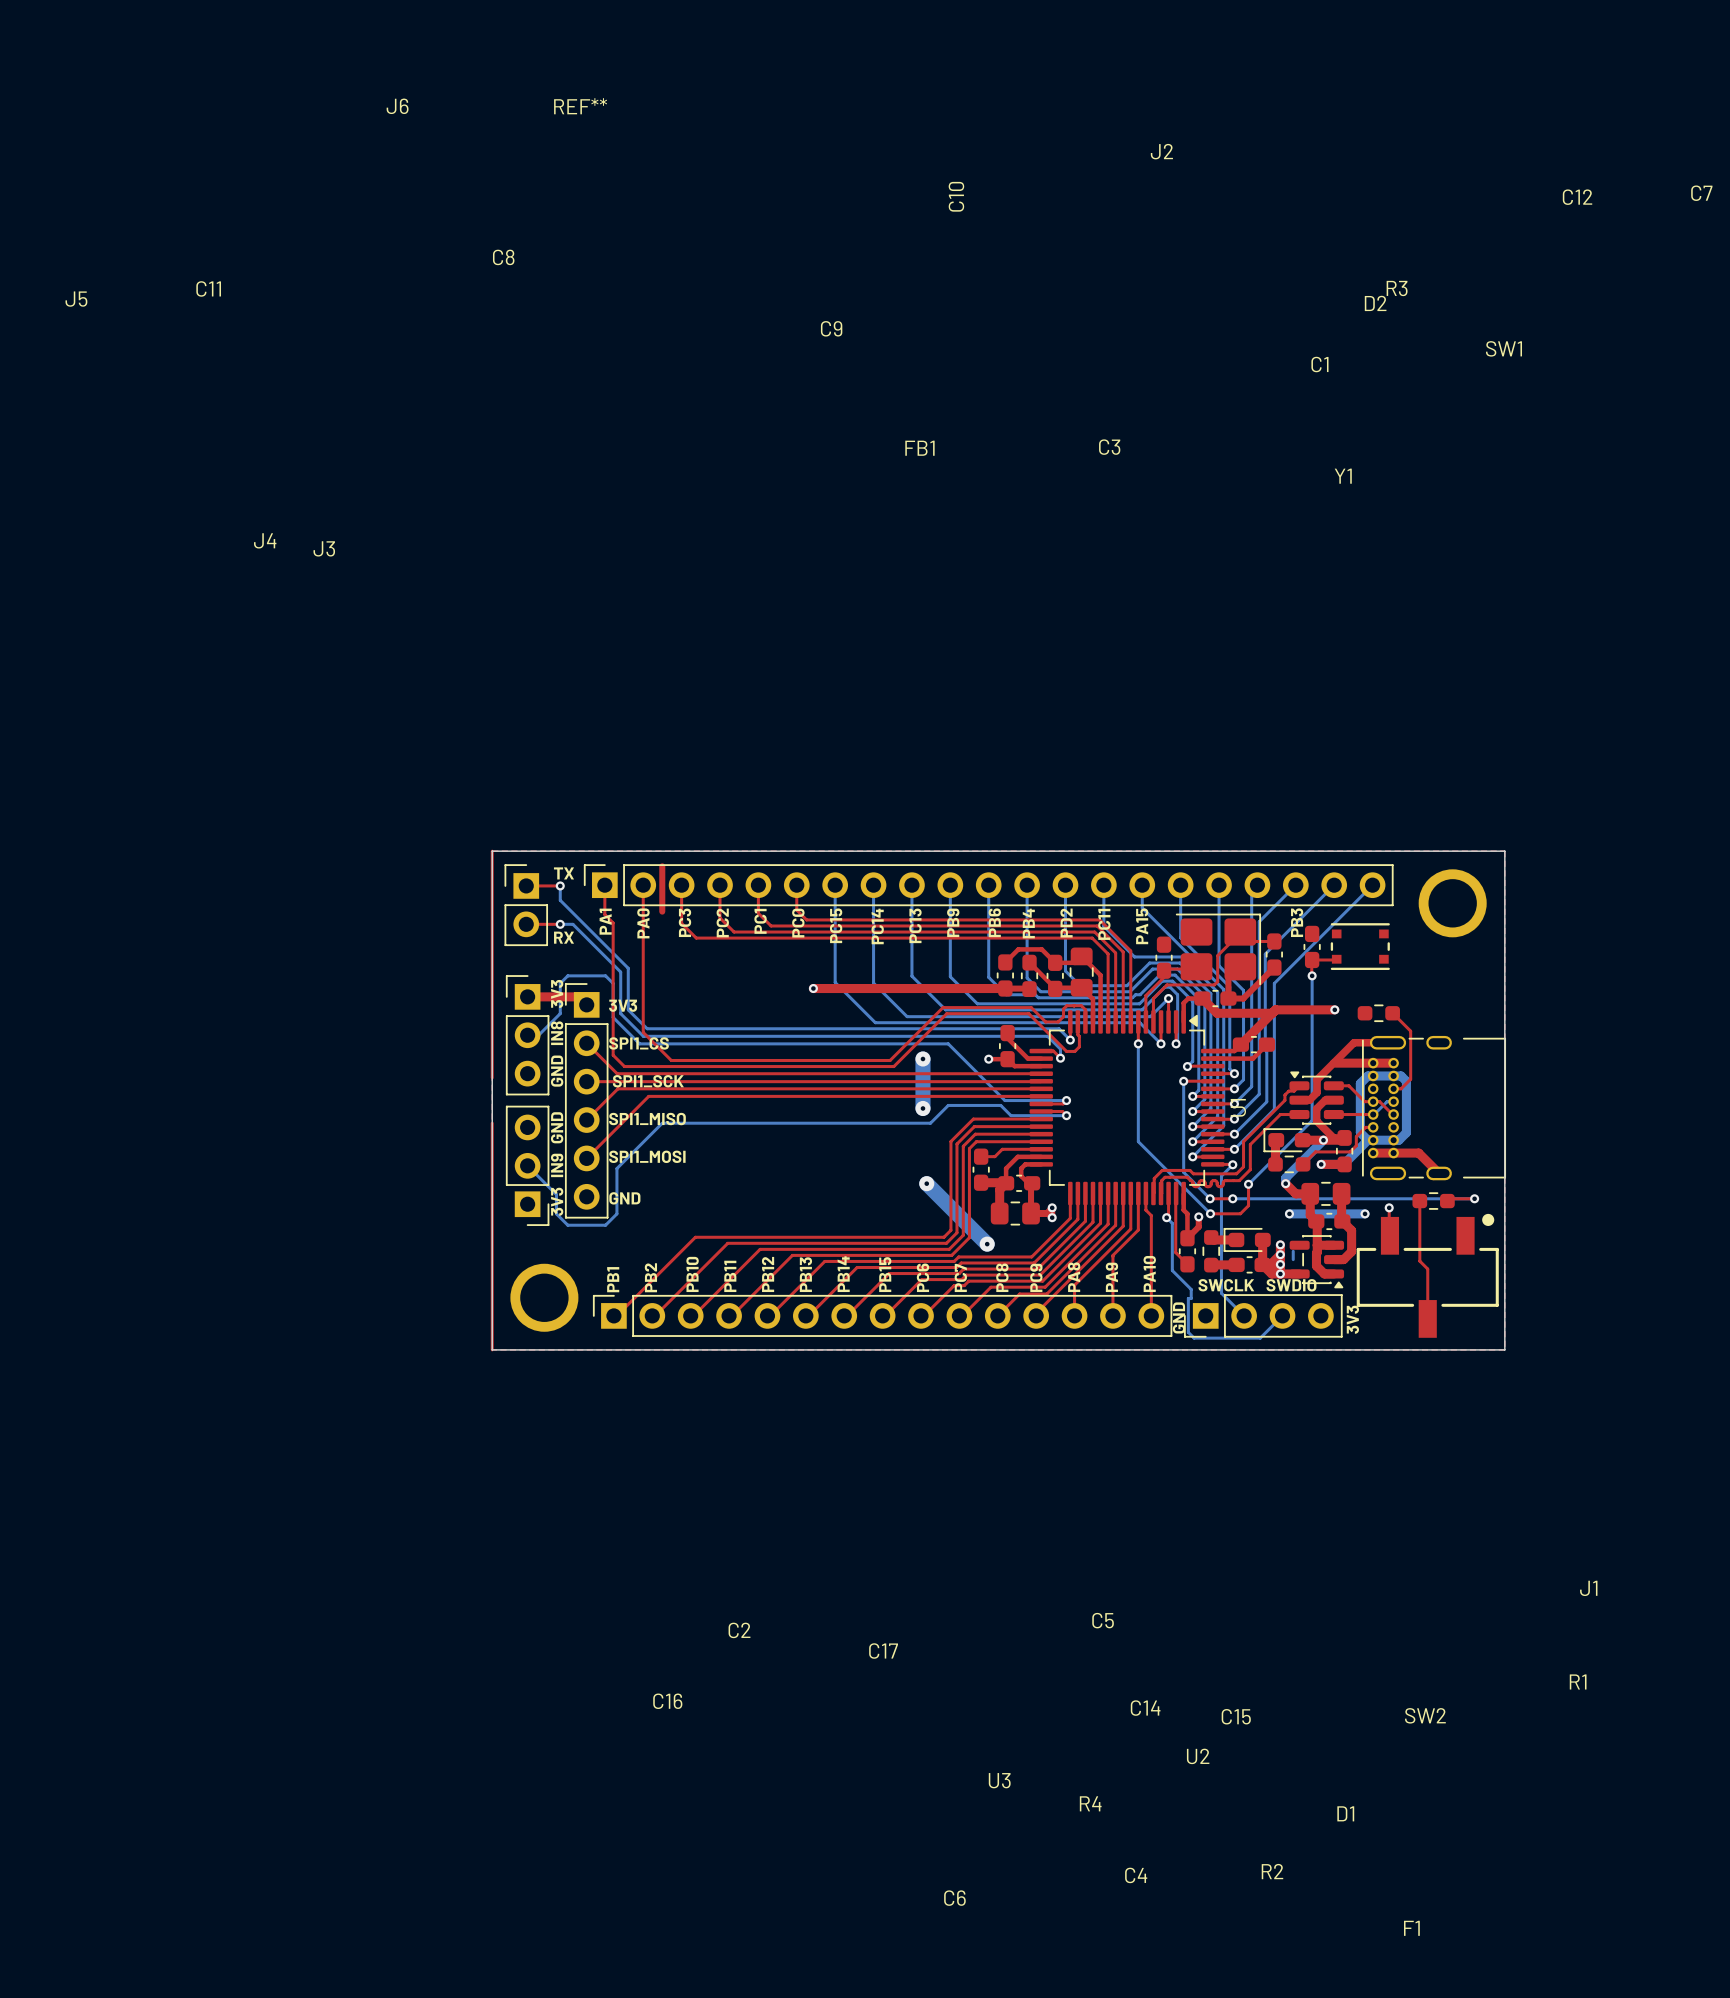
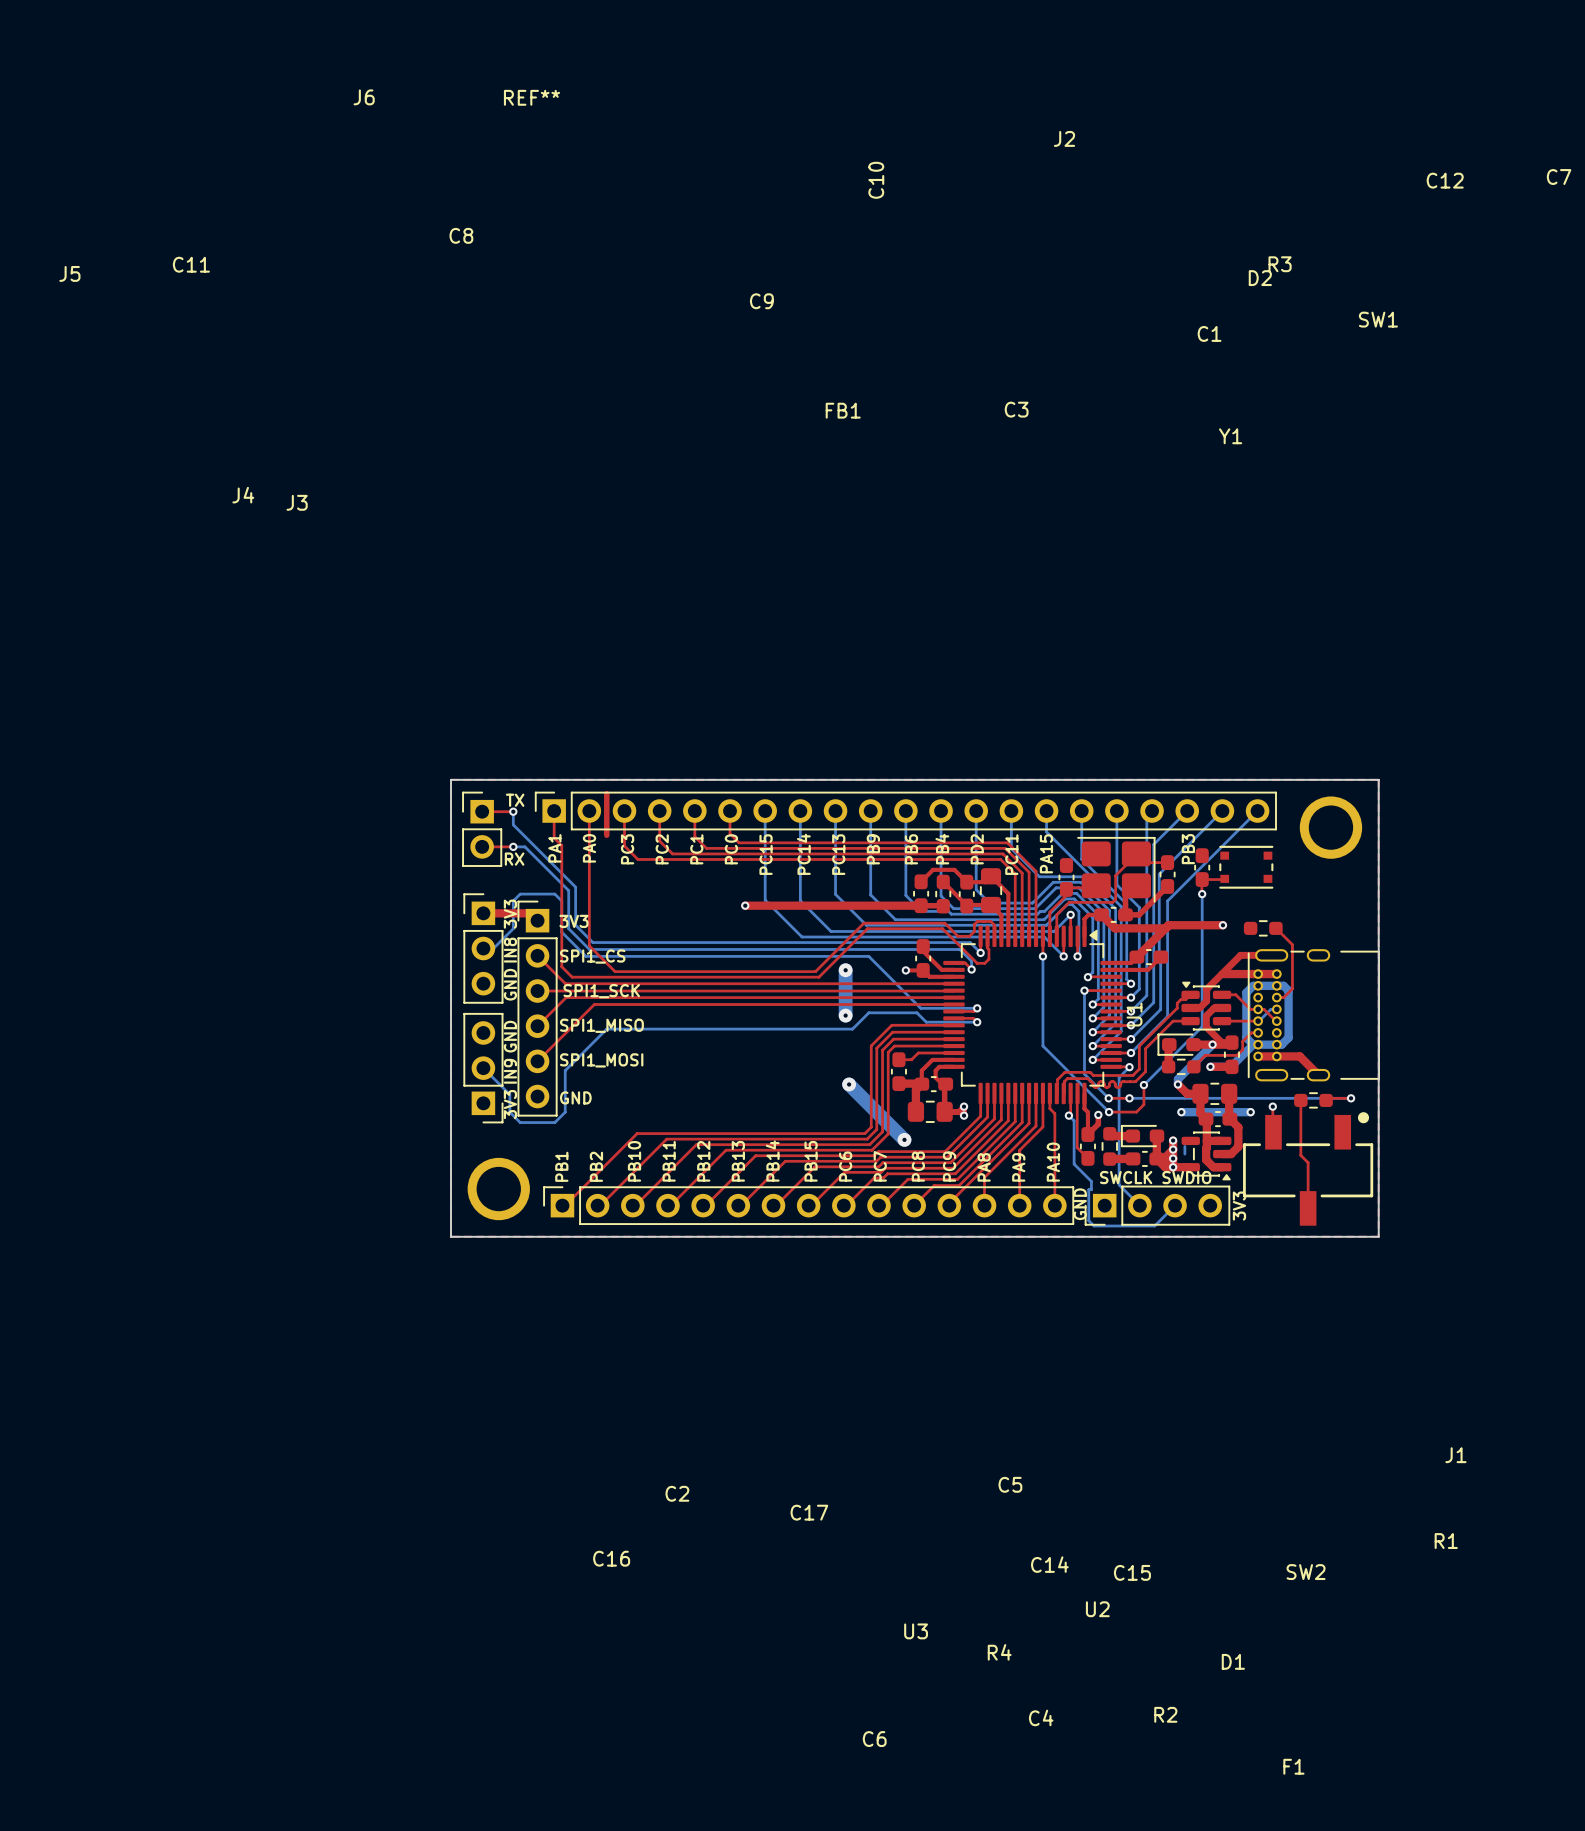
top track: (492, 851) (492, 1077) -> none
top track: (492, 1123) (492, 1349) -> none

